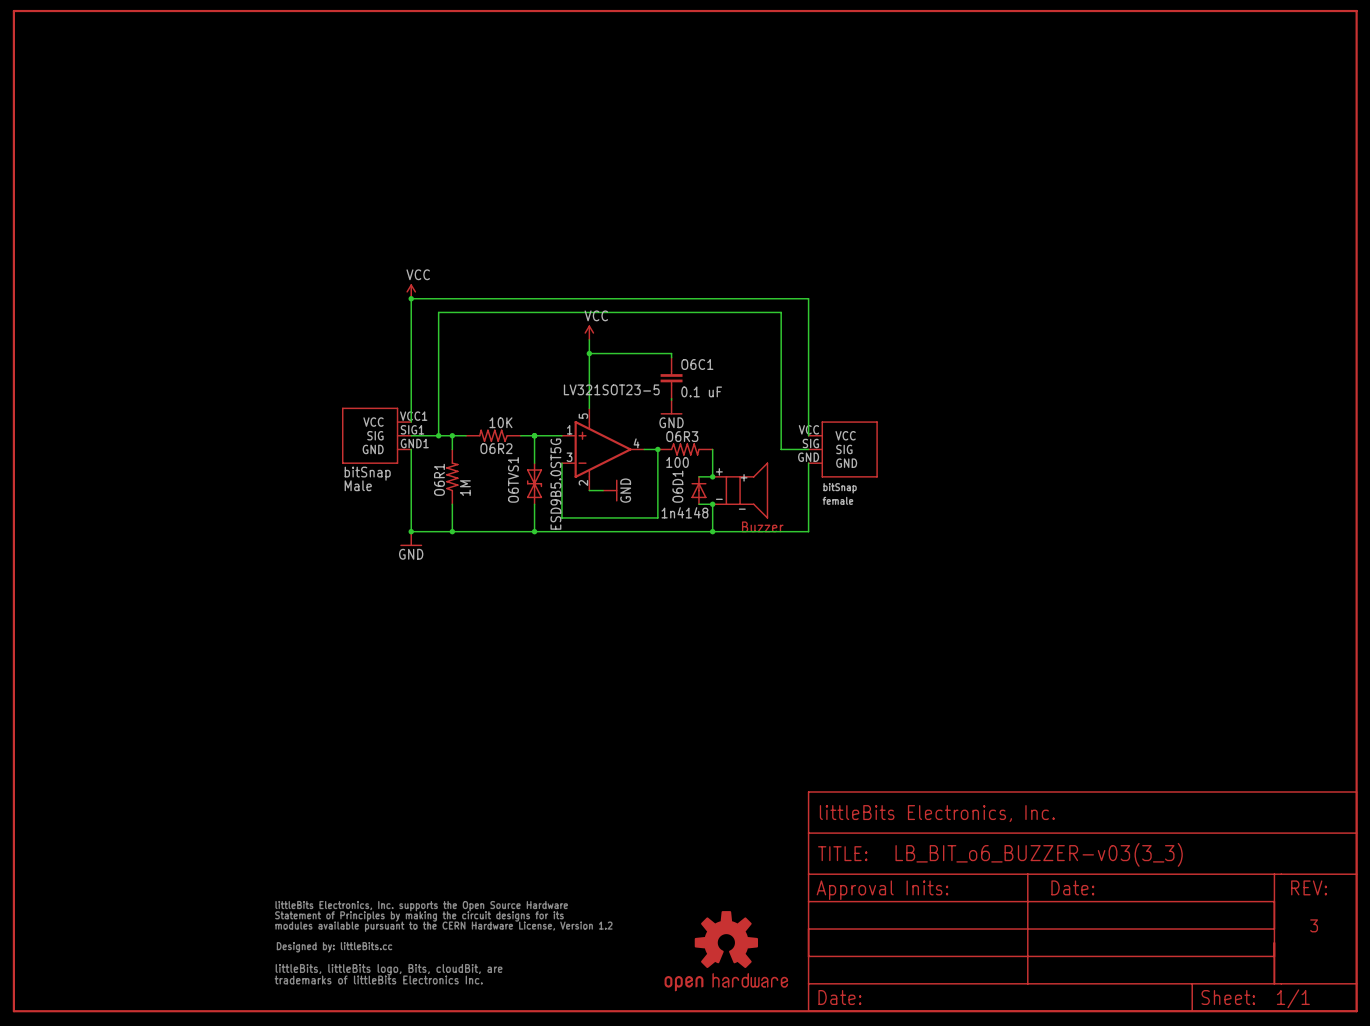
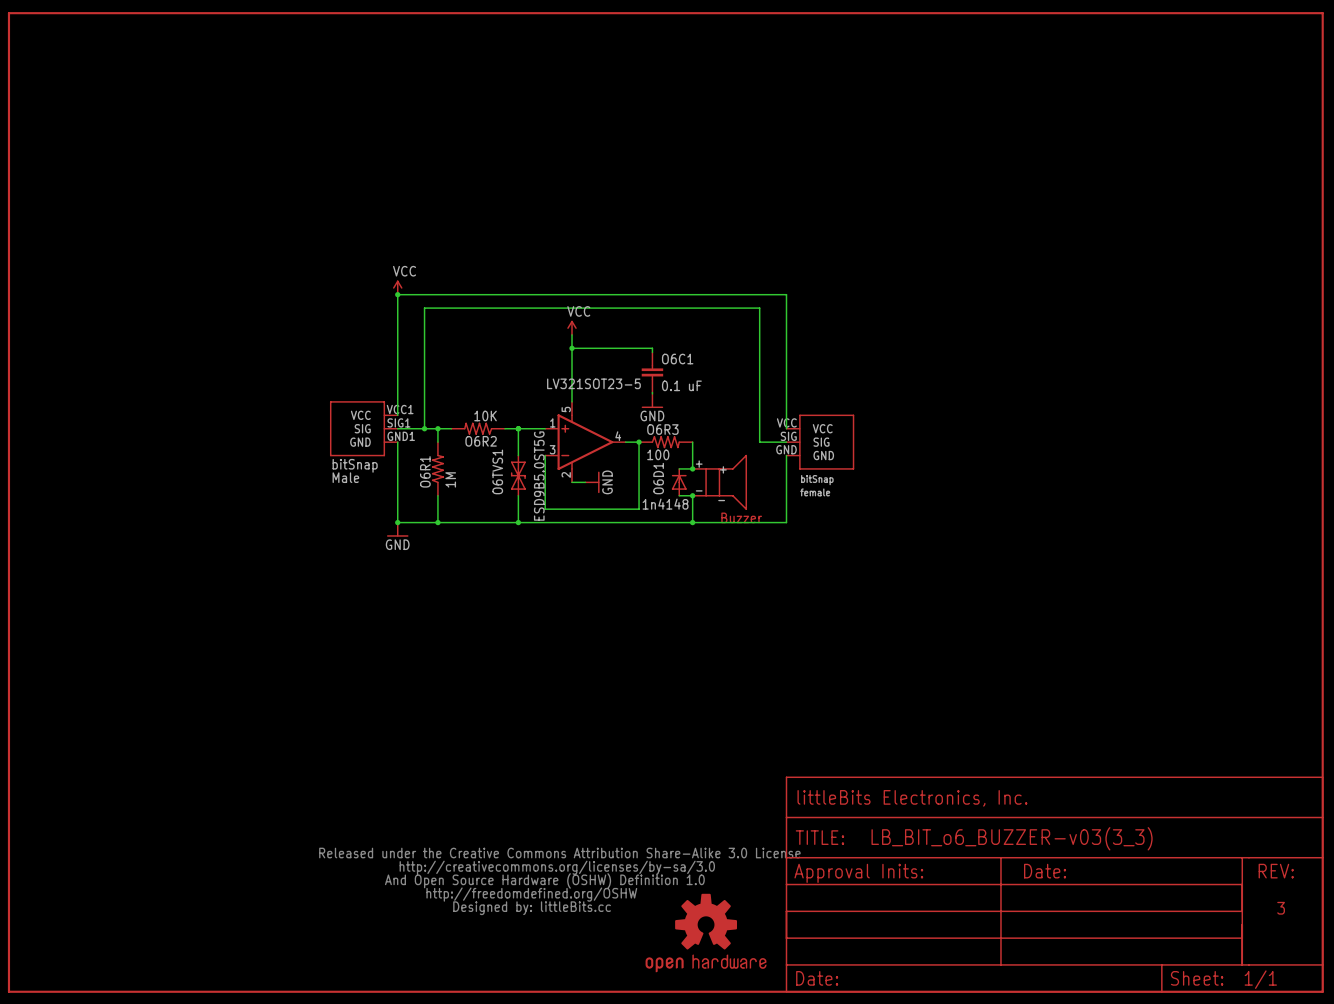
part: none -> (559, 881)
part: (443, 942) -> none

